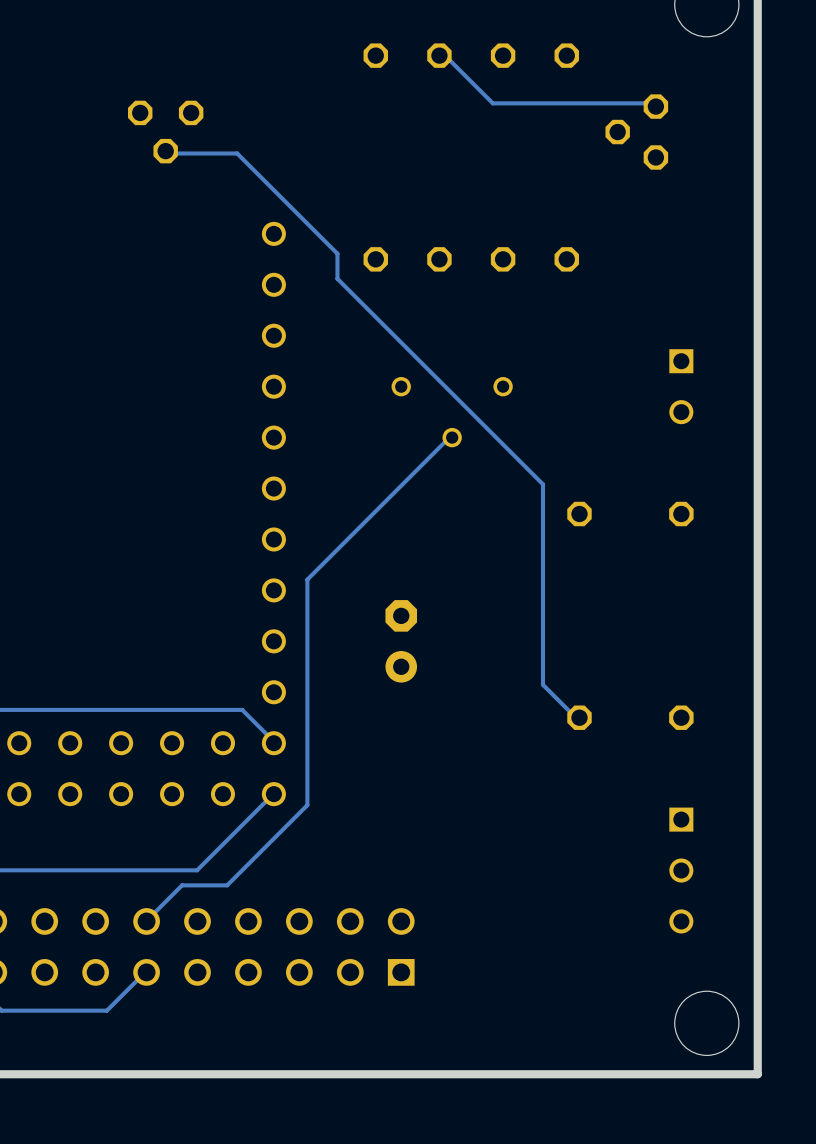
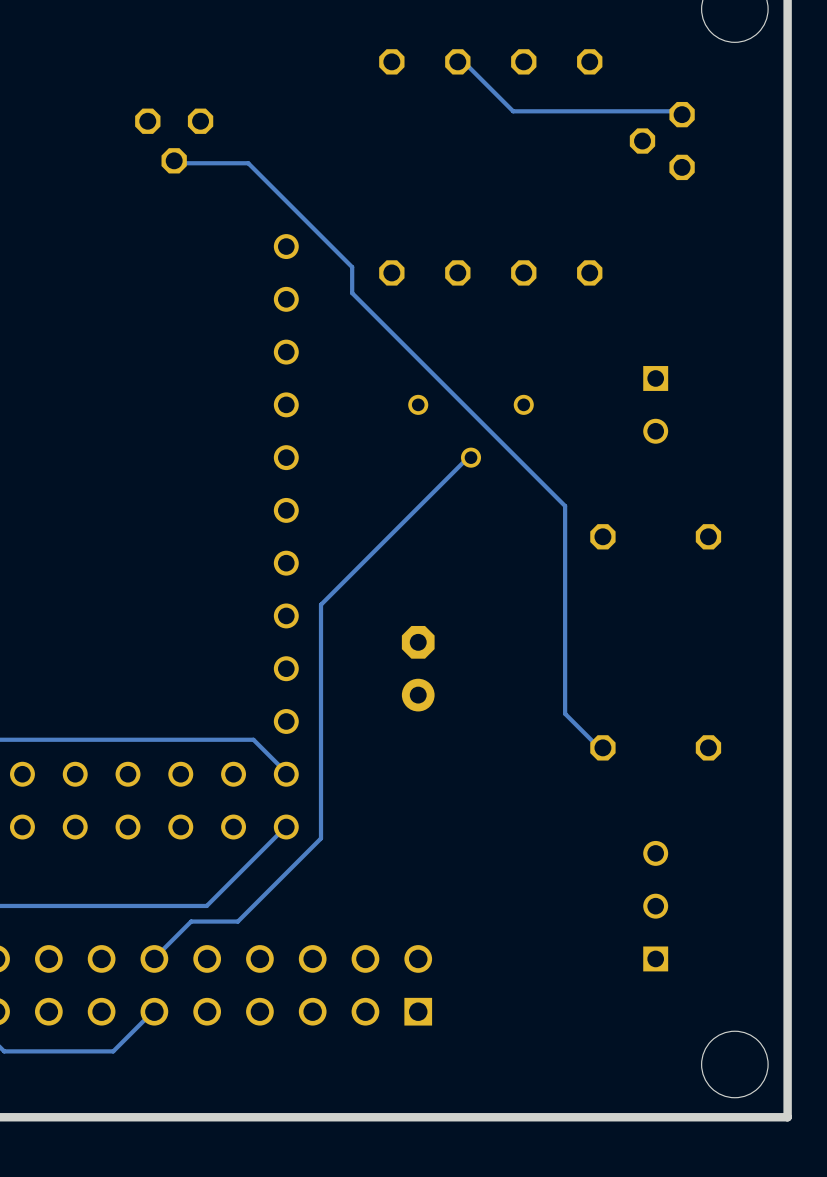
part position: (681, 386) -> (655, 404)
part rotation: 0° (681, 870) -> 180° (655, 906)

